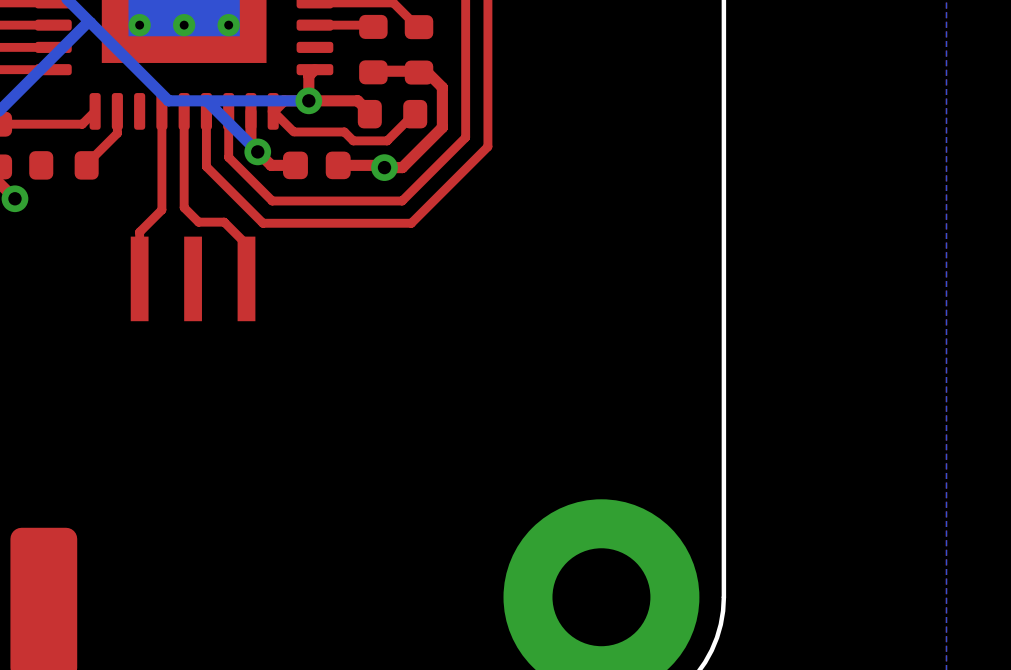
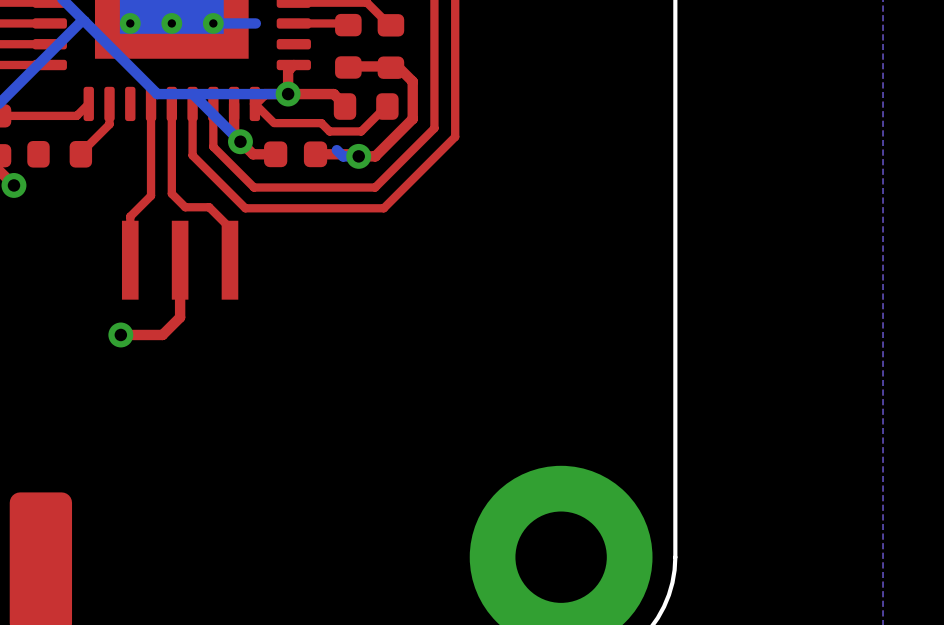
bottom track: none -> (255, 23) (213, 23)
bottom track: none -> (336, 150) (343, 156) (358, 156)
top track: none -> (180, 260) (180, 317) (162, 334) (120, 334)
via: none -> (120, 334)

